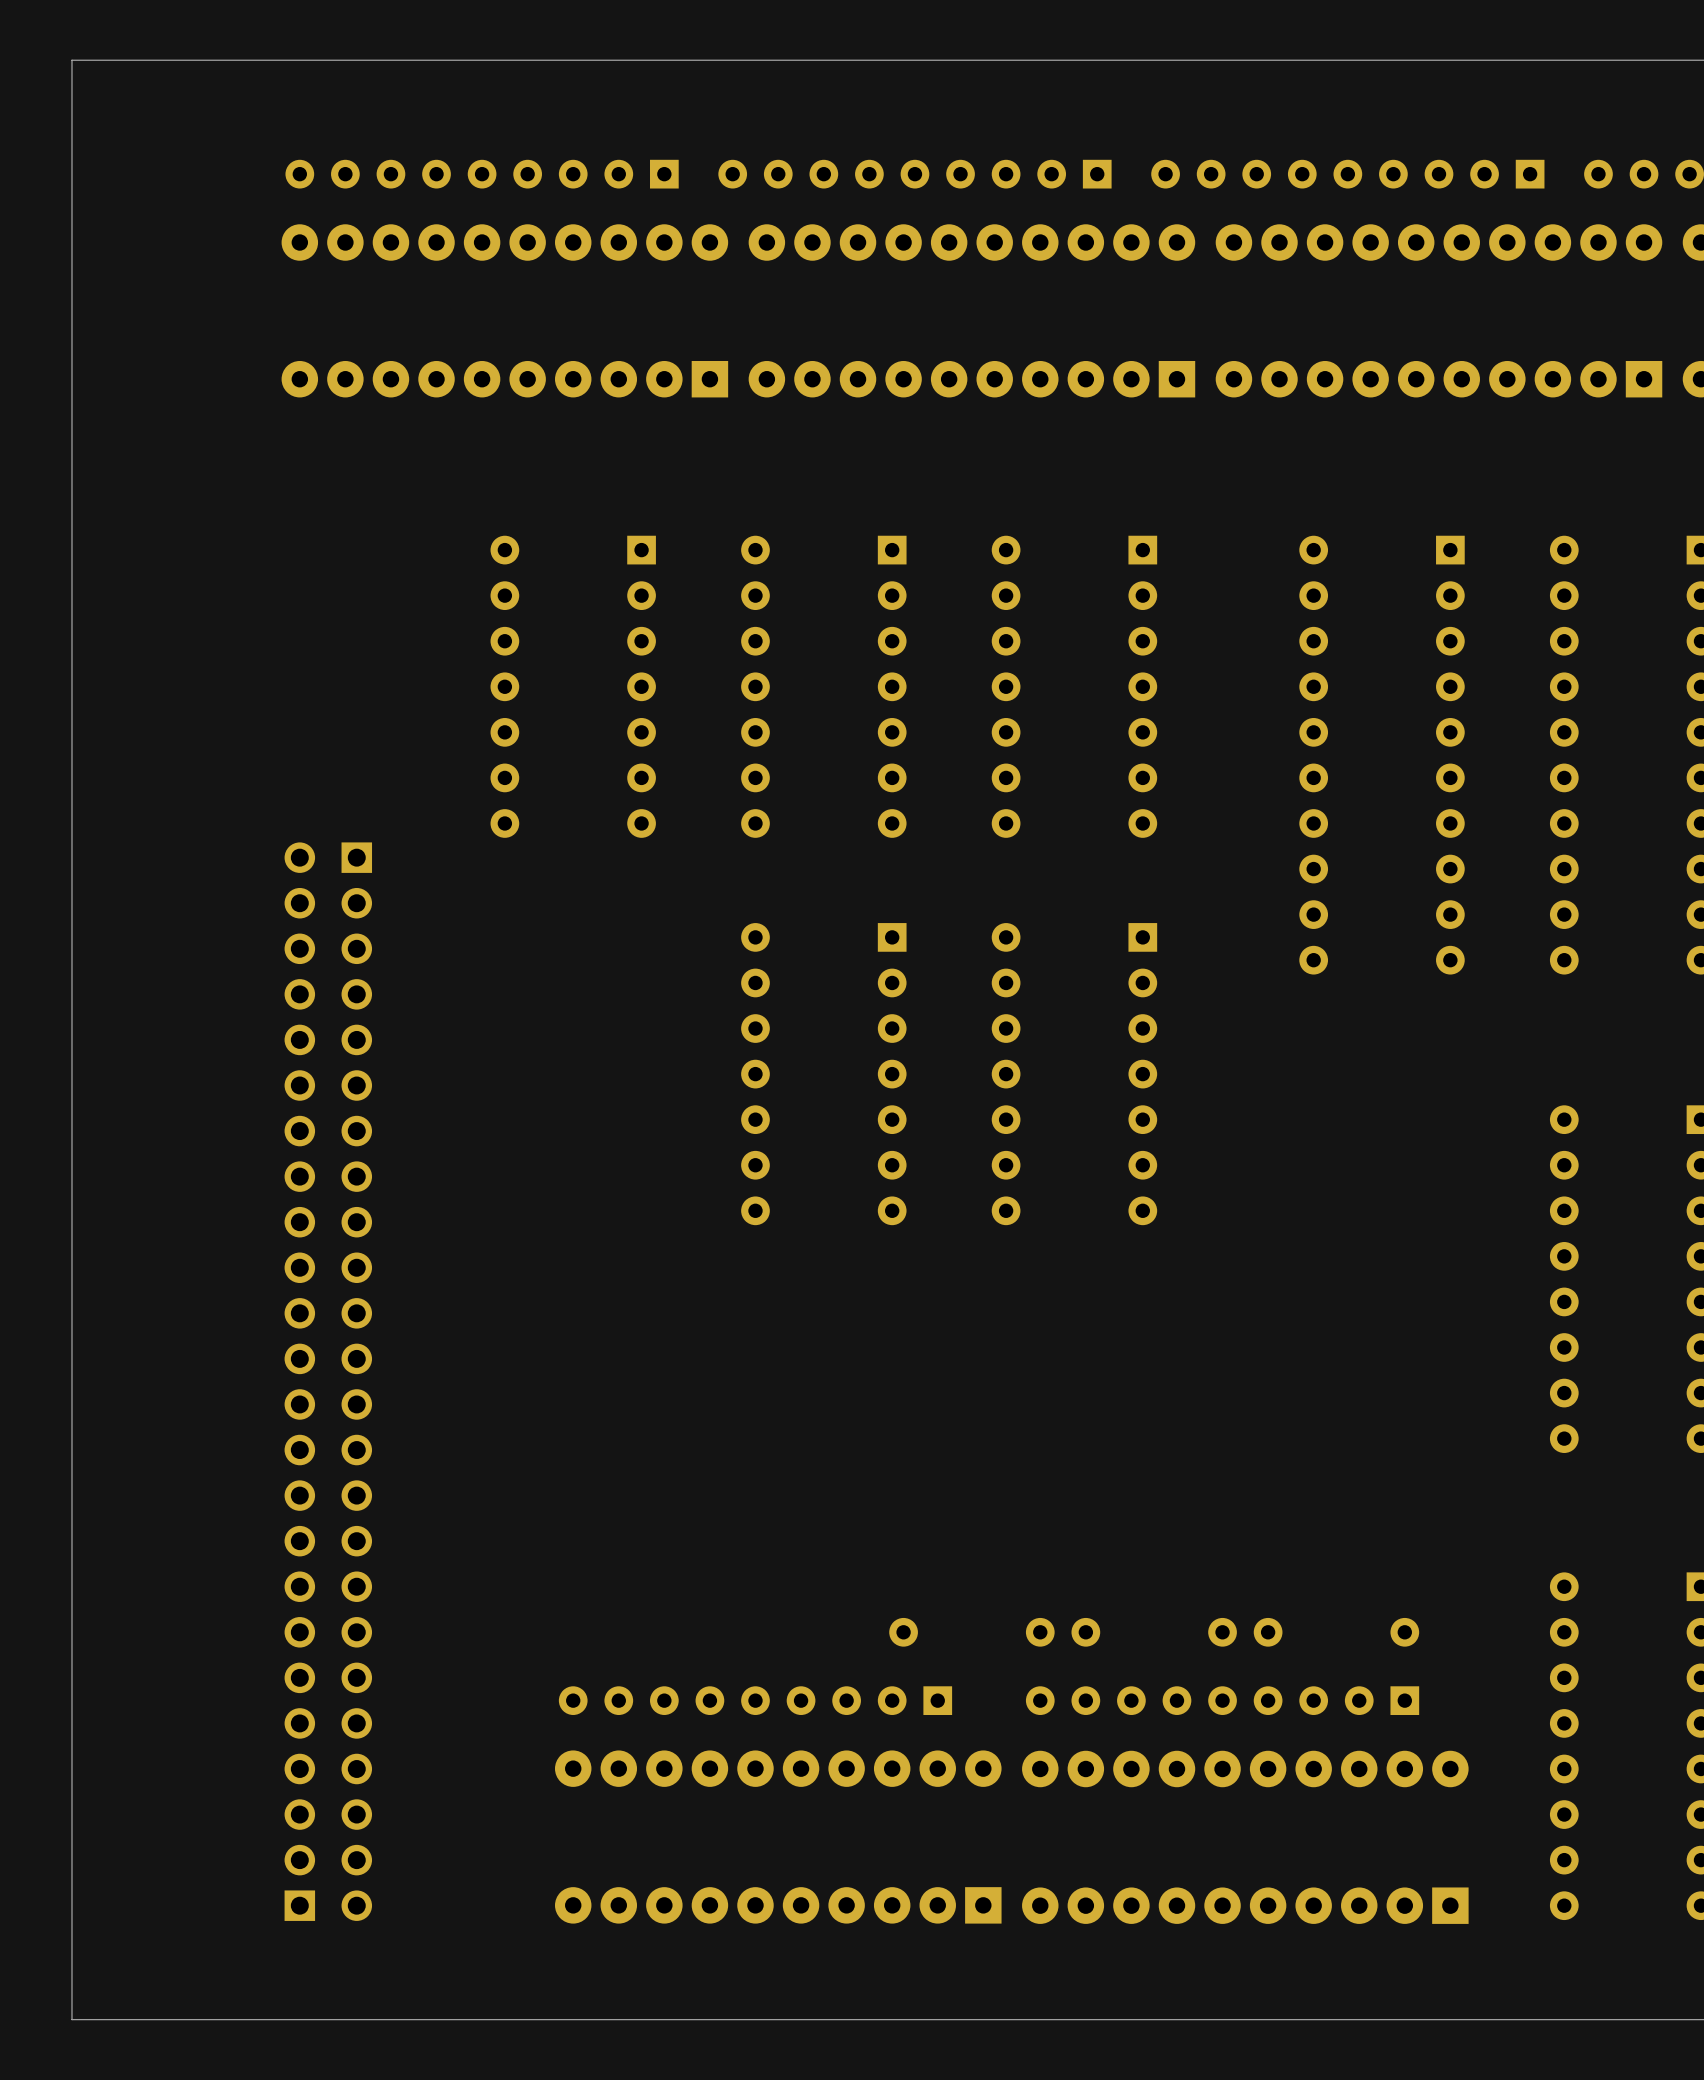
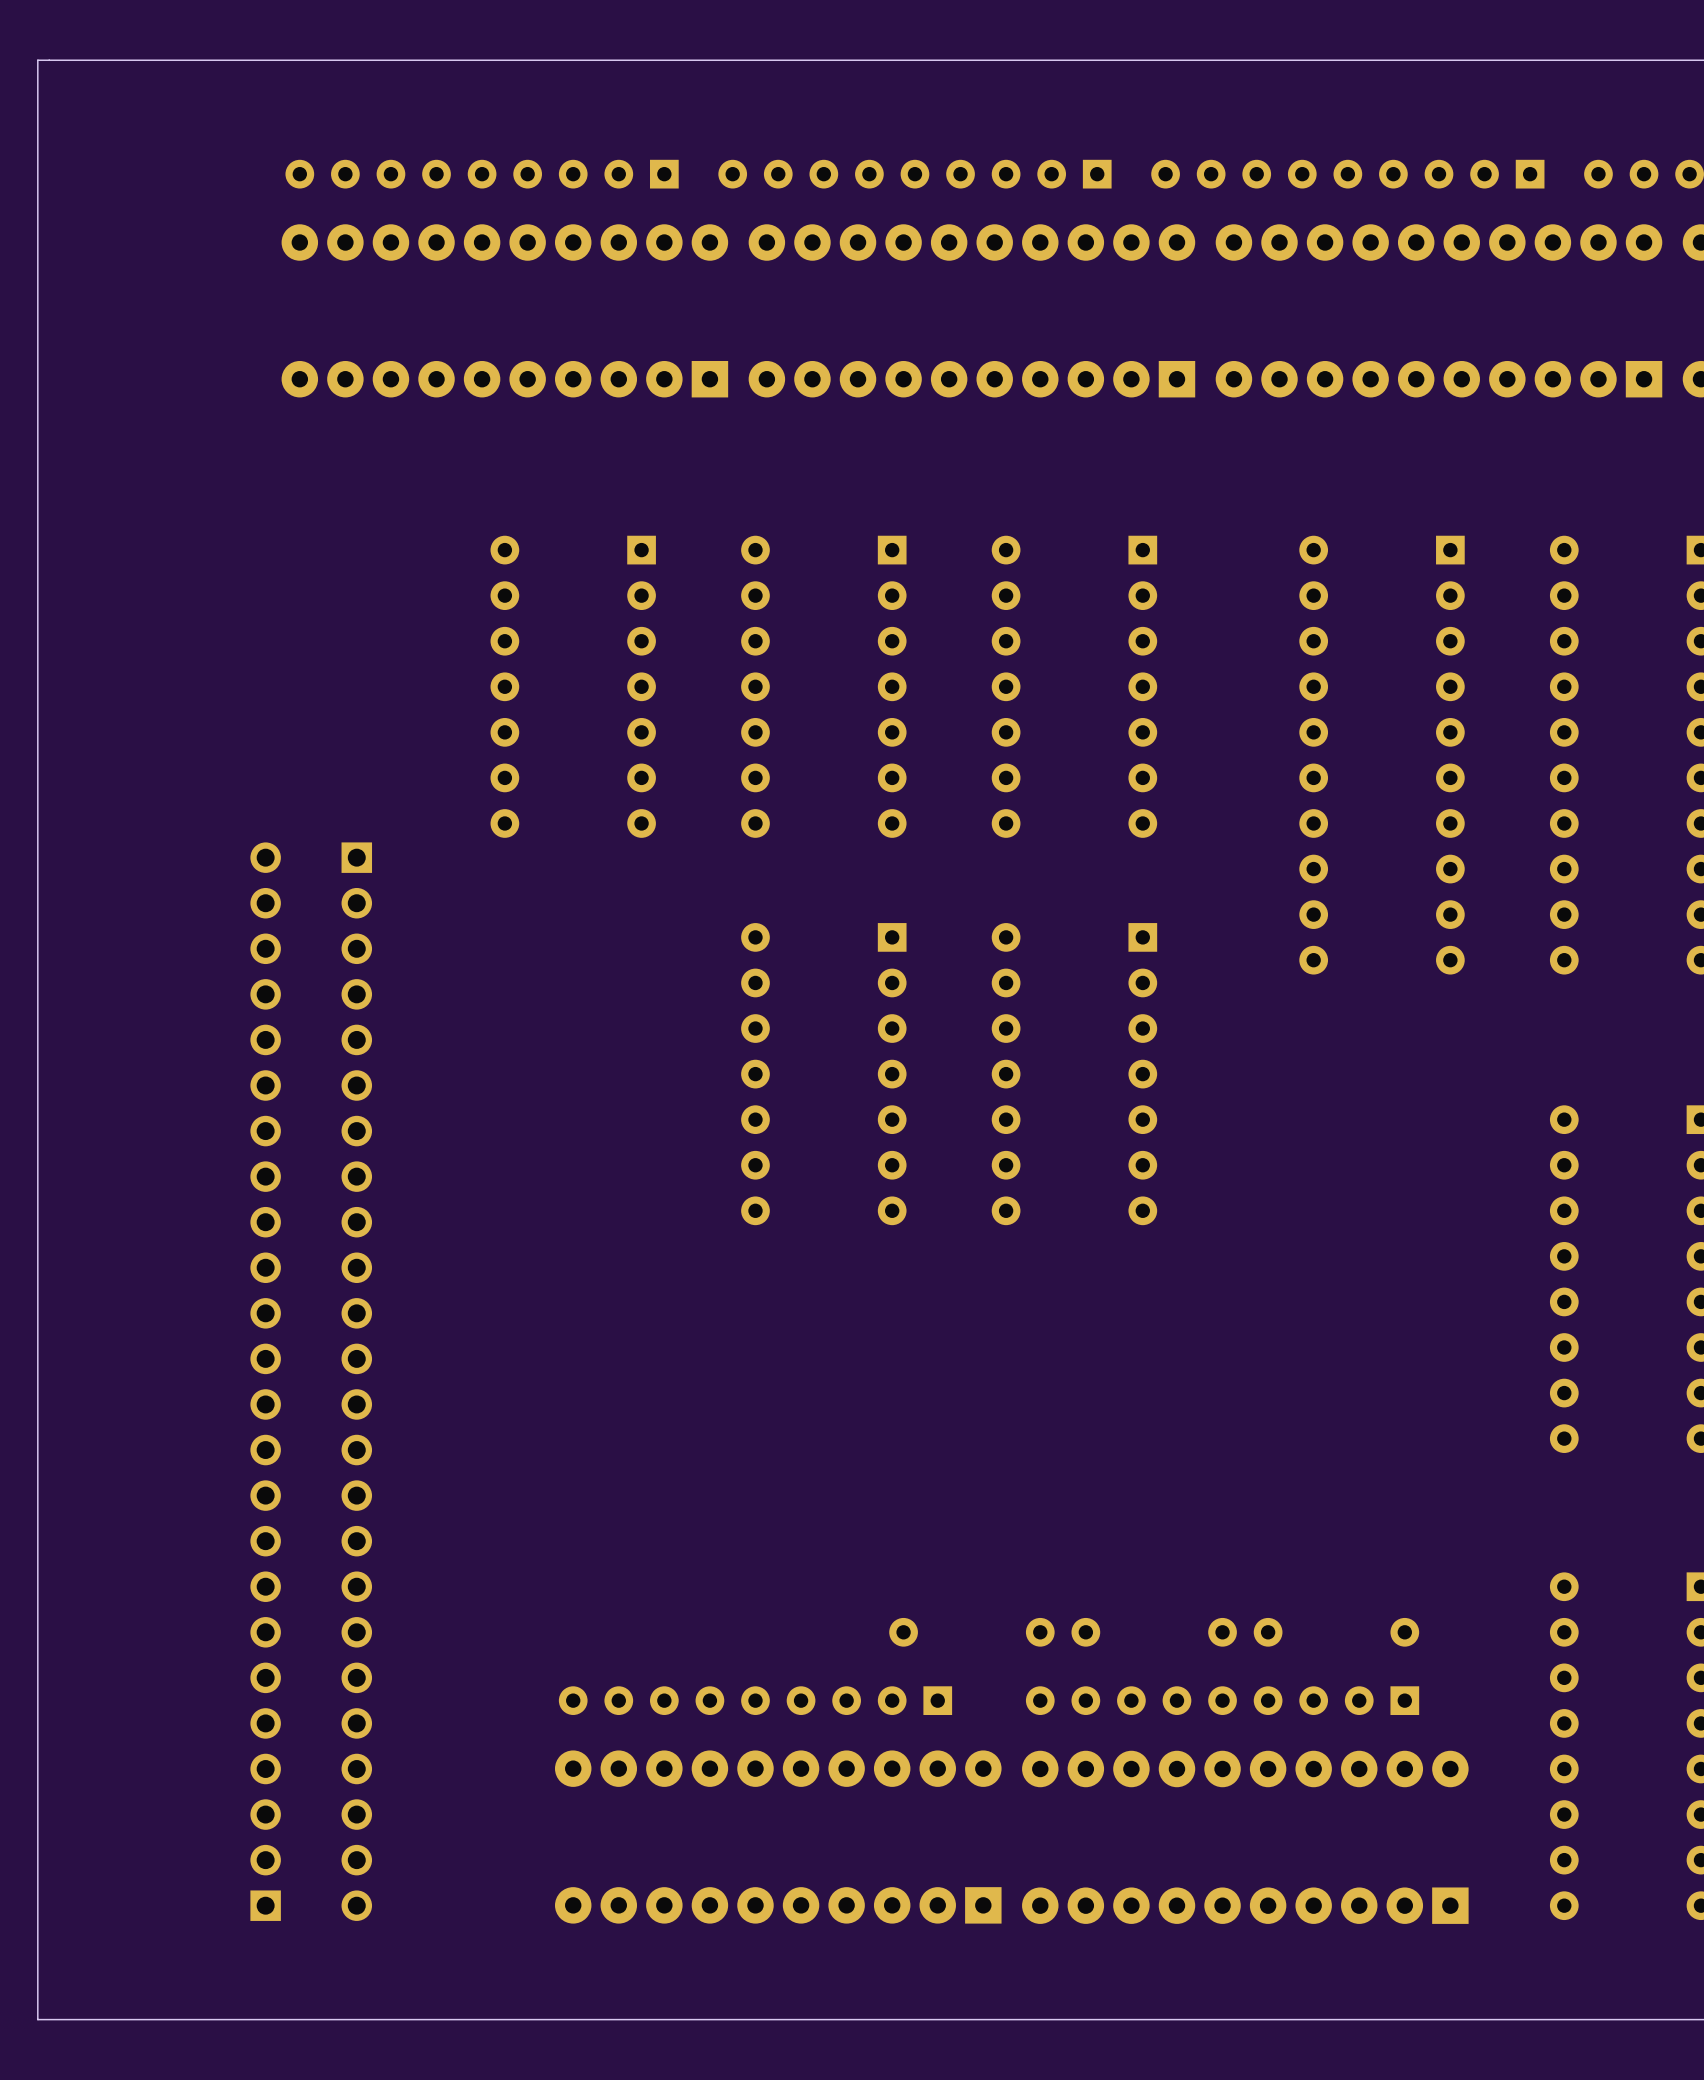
board edge: (71, 60) (71, 2019) -> (71, 60) (37, 60) (37, 2019) (71, 2019)
part position: (299, 1381) -> (265, 1381)

